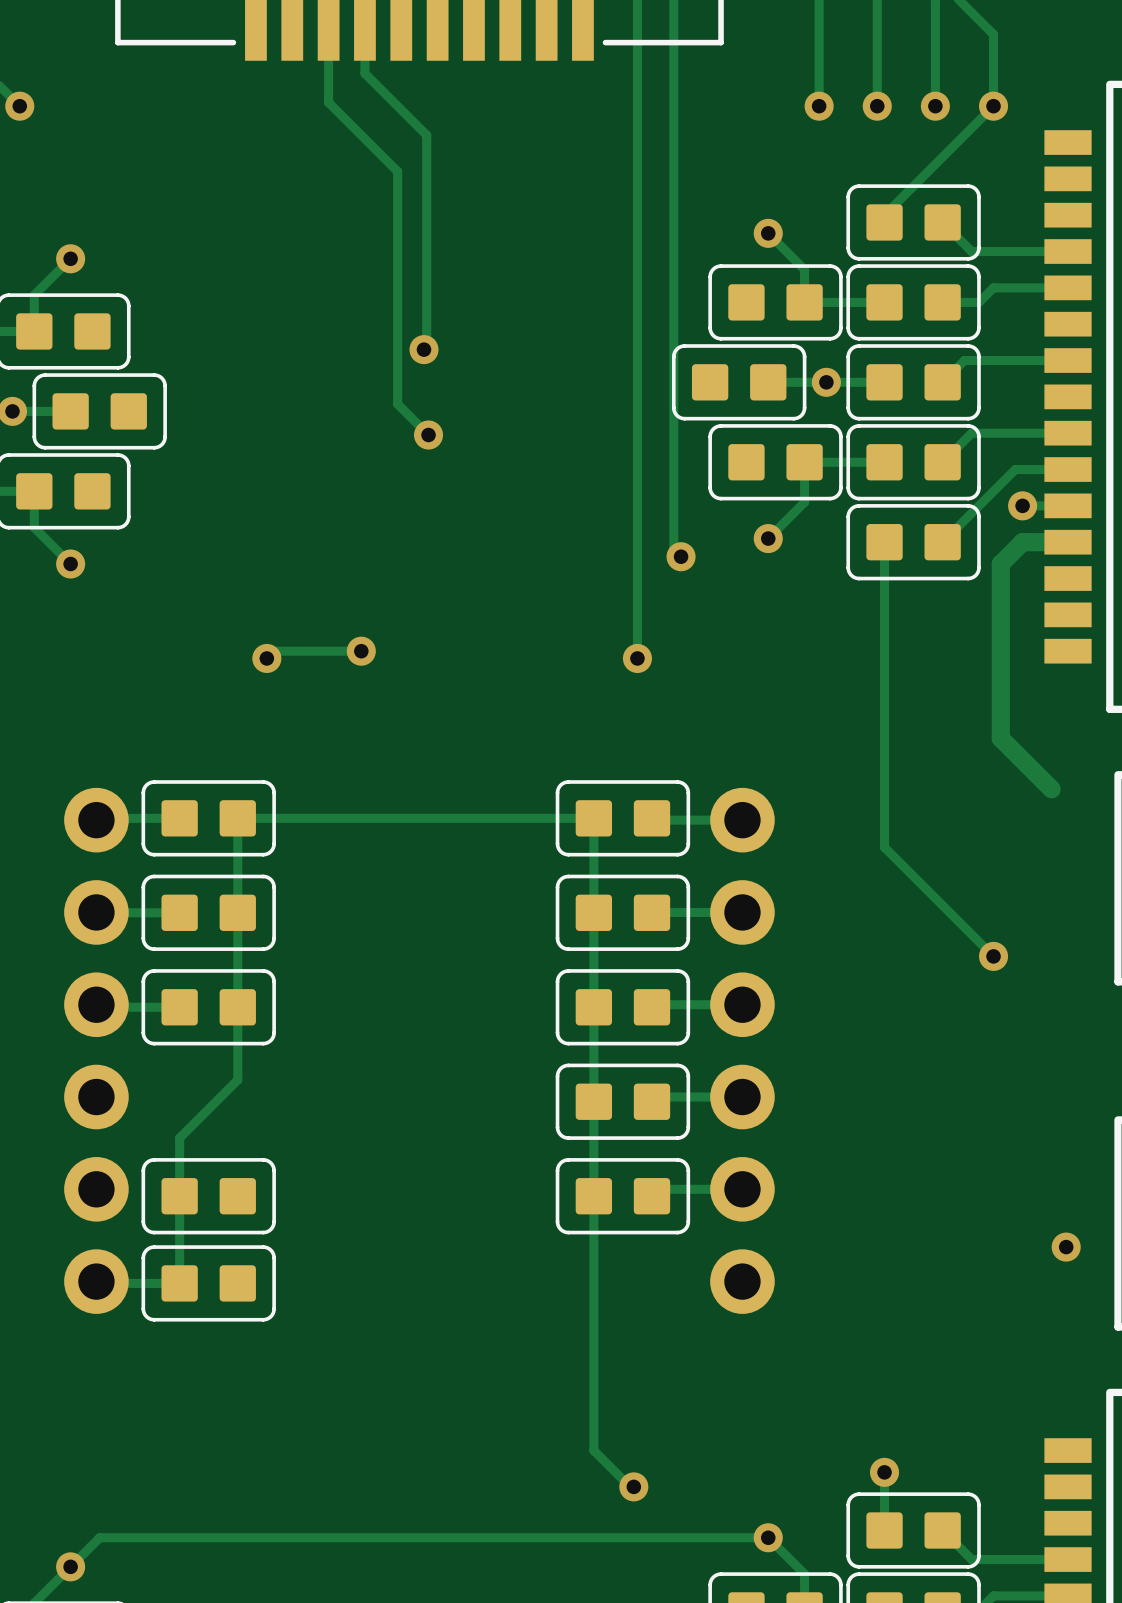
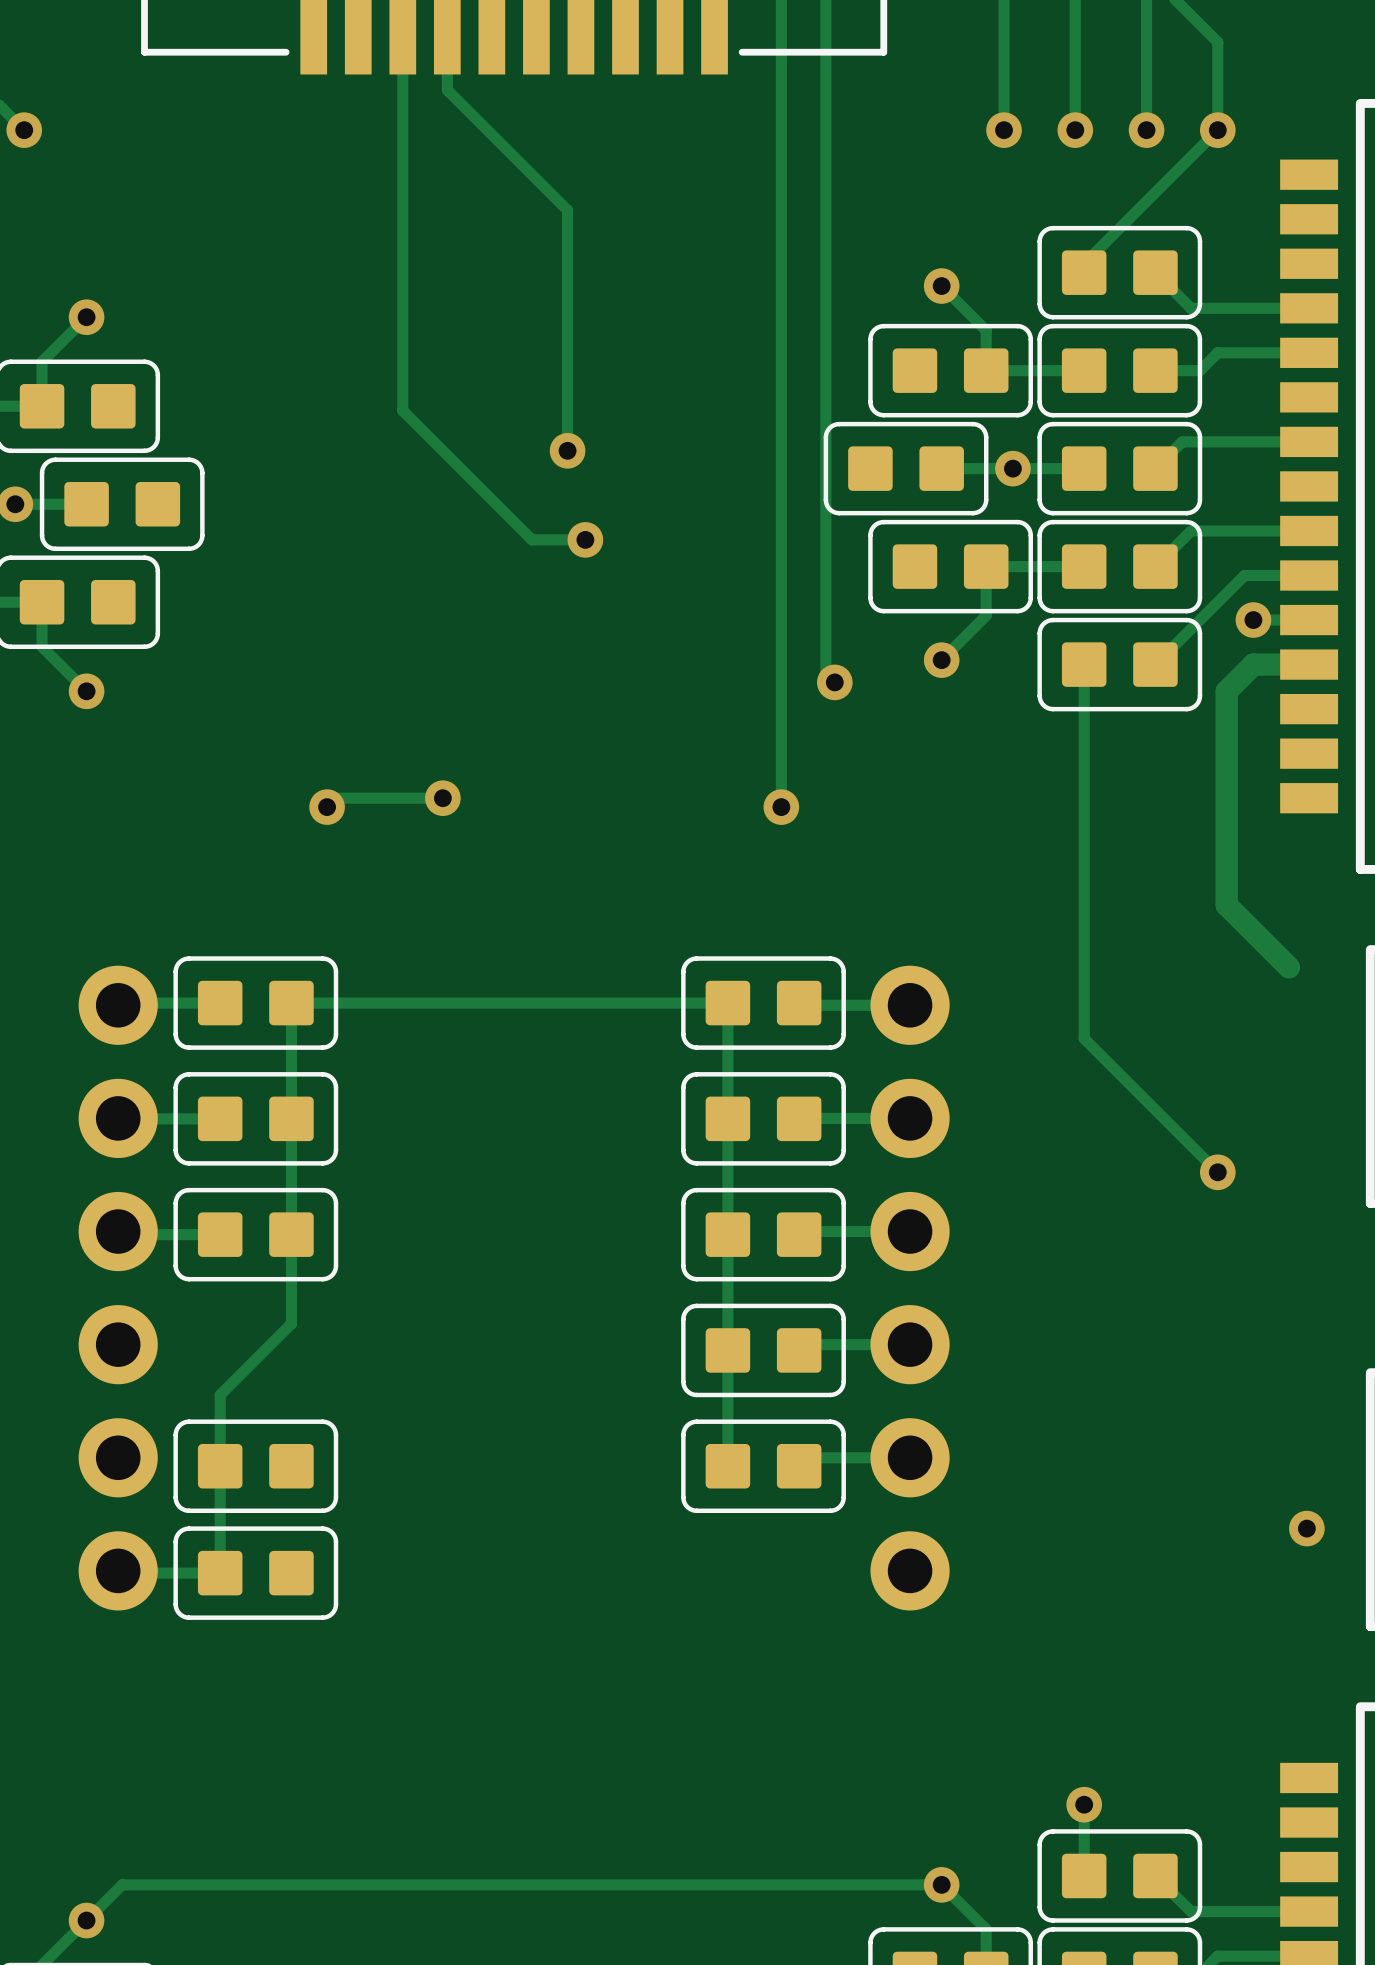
track: (328, 102) (397, 171) (397, 404) -> (402, 125) (402, 410) (487, 495)
track: (426, 135) (426, 346) (423, 349) -> (523, 165) (567, 210) (567, 450)
via: (423, 349) -> none
via: none -> (567, 450)
track: none -> (525, 533) (531, 539) (585, 539)
via: (428, 435) -> none
via: none -> (585, 539)
track: (593, 1196) (593, 1450) (630, 1486) (633, 1486) (633, 1490) -> none
via: (633, 1486) -> none

